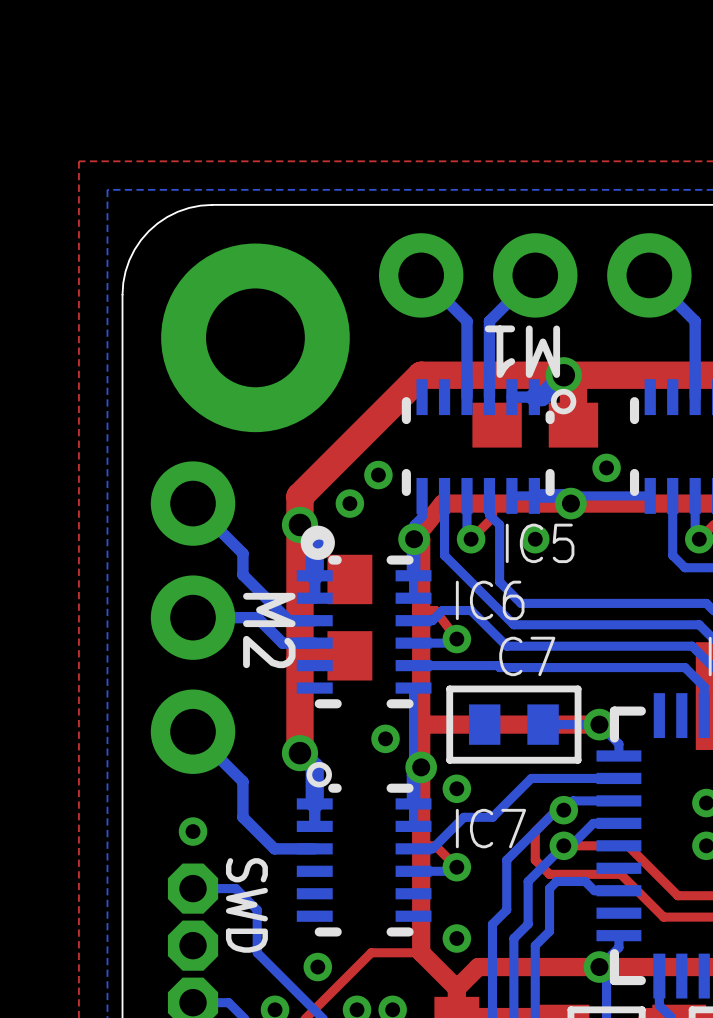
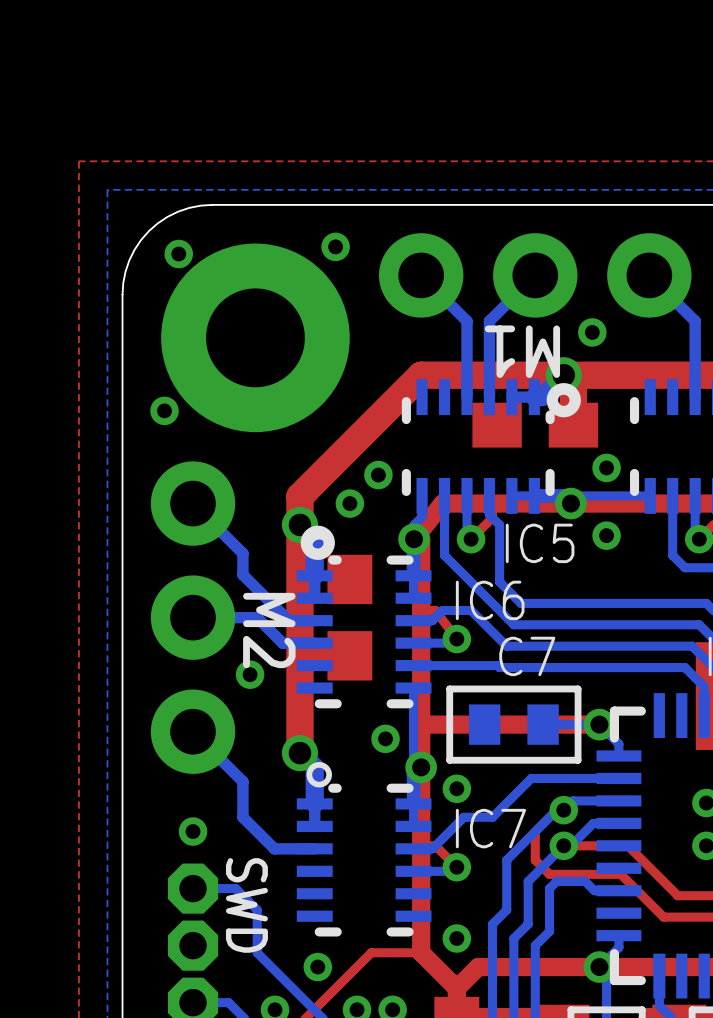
via: none -> (335, 246)
via: none -> (178, 254)
via: none -> (592, 332)
drawing: none -> [546, 383, 581, 418]
via: none -> (164, 410)
via position: (535, 539) -> (606, 535)
via: none -> (250, 674)

